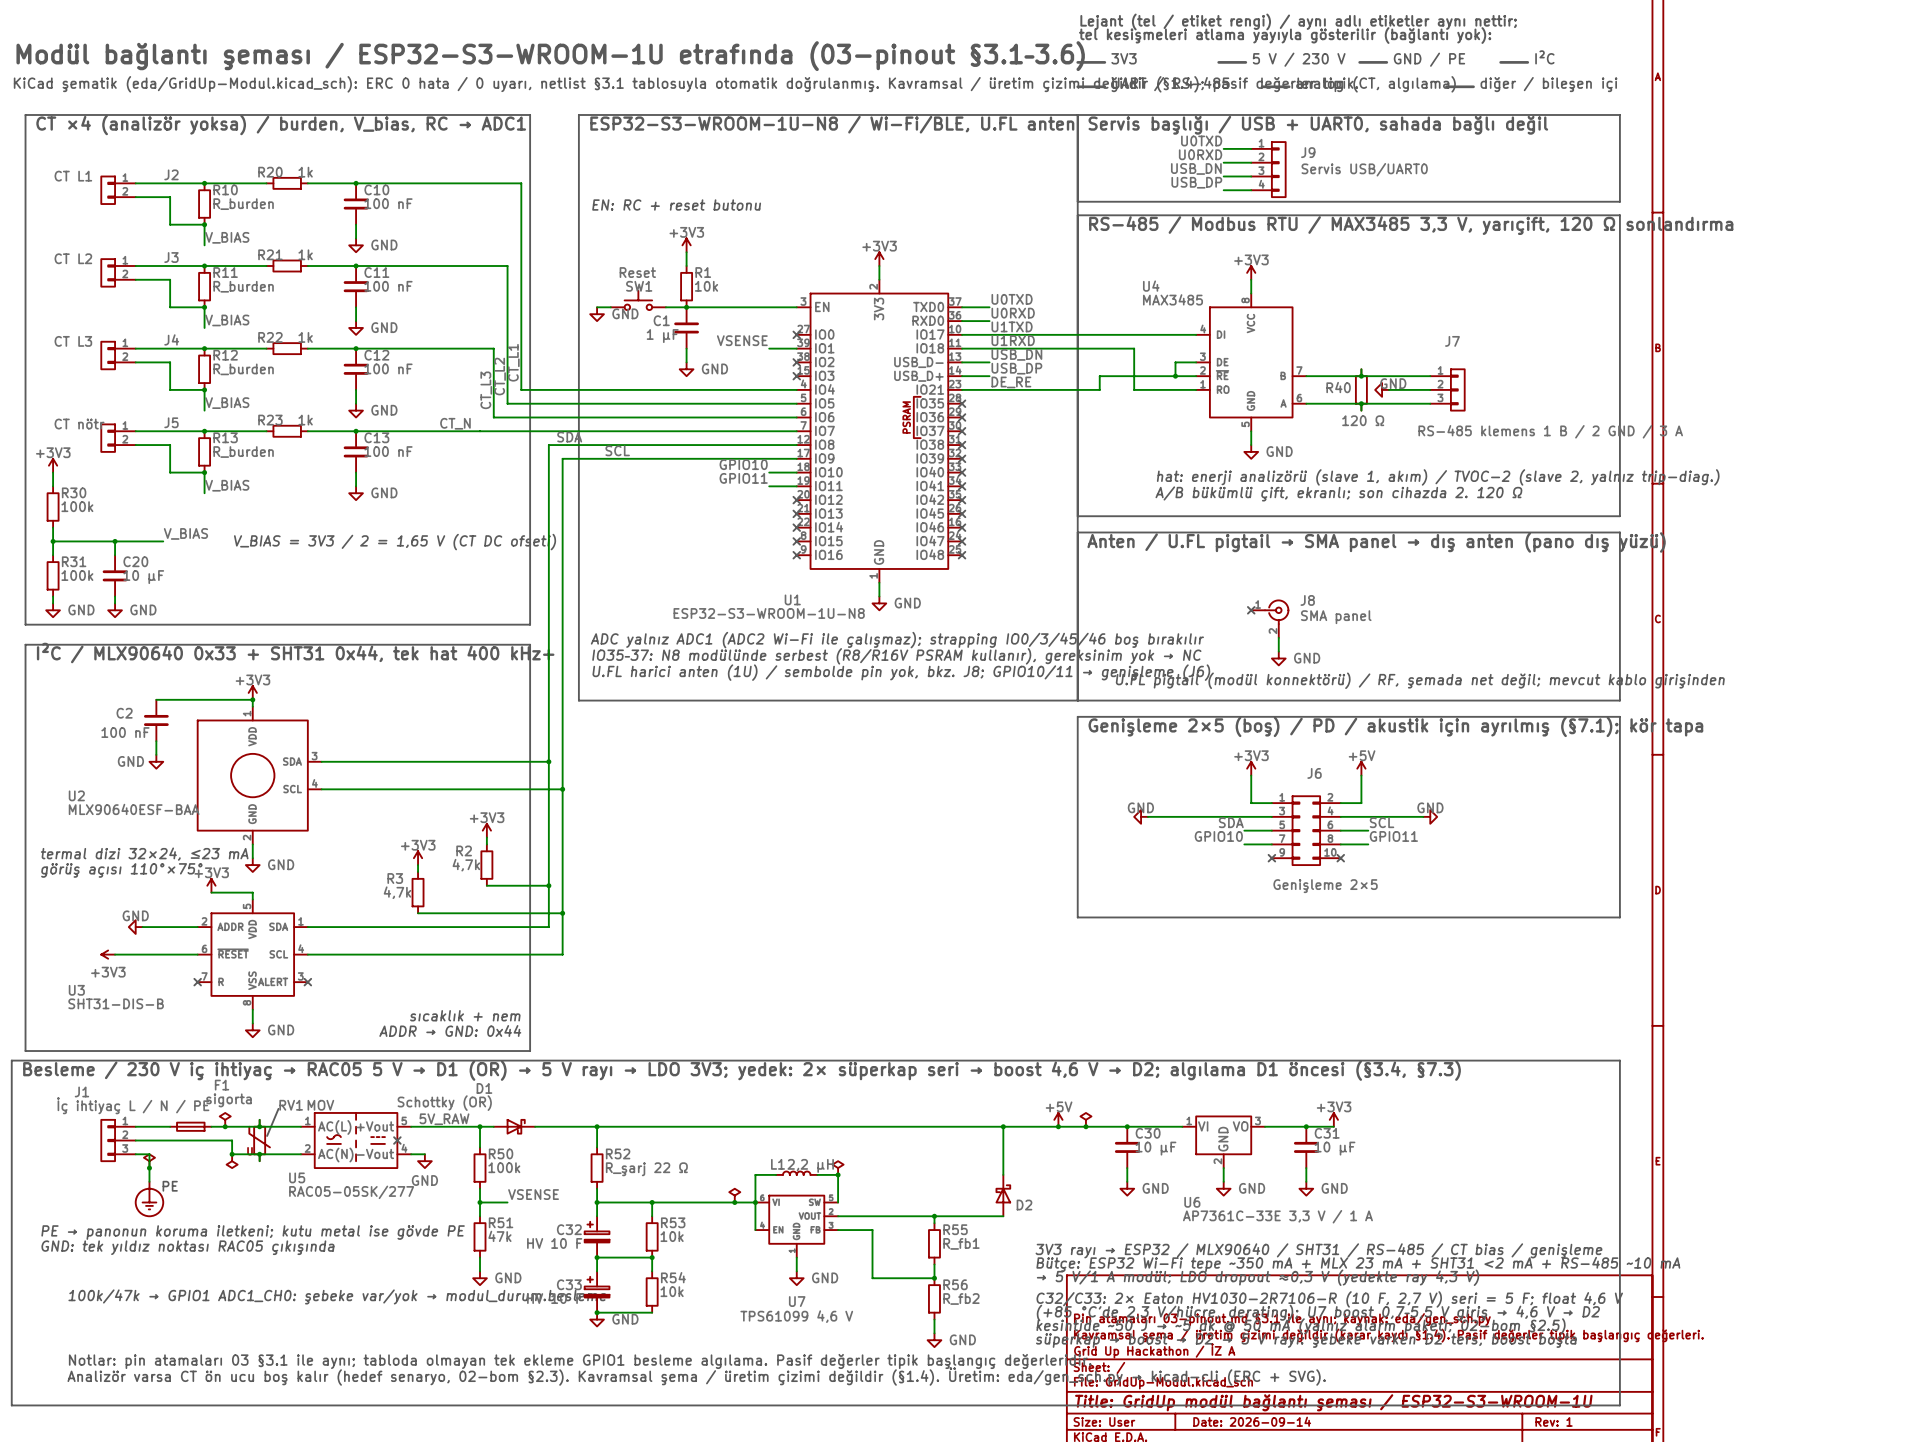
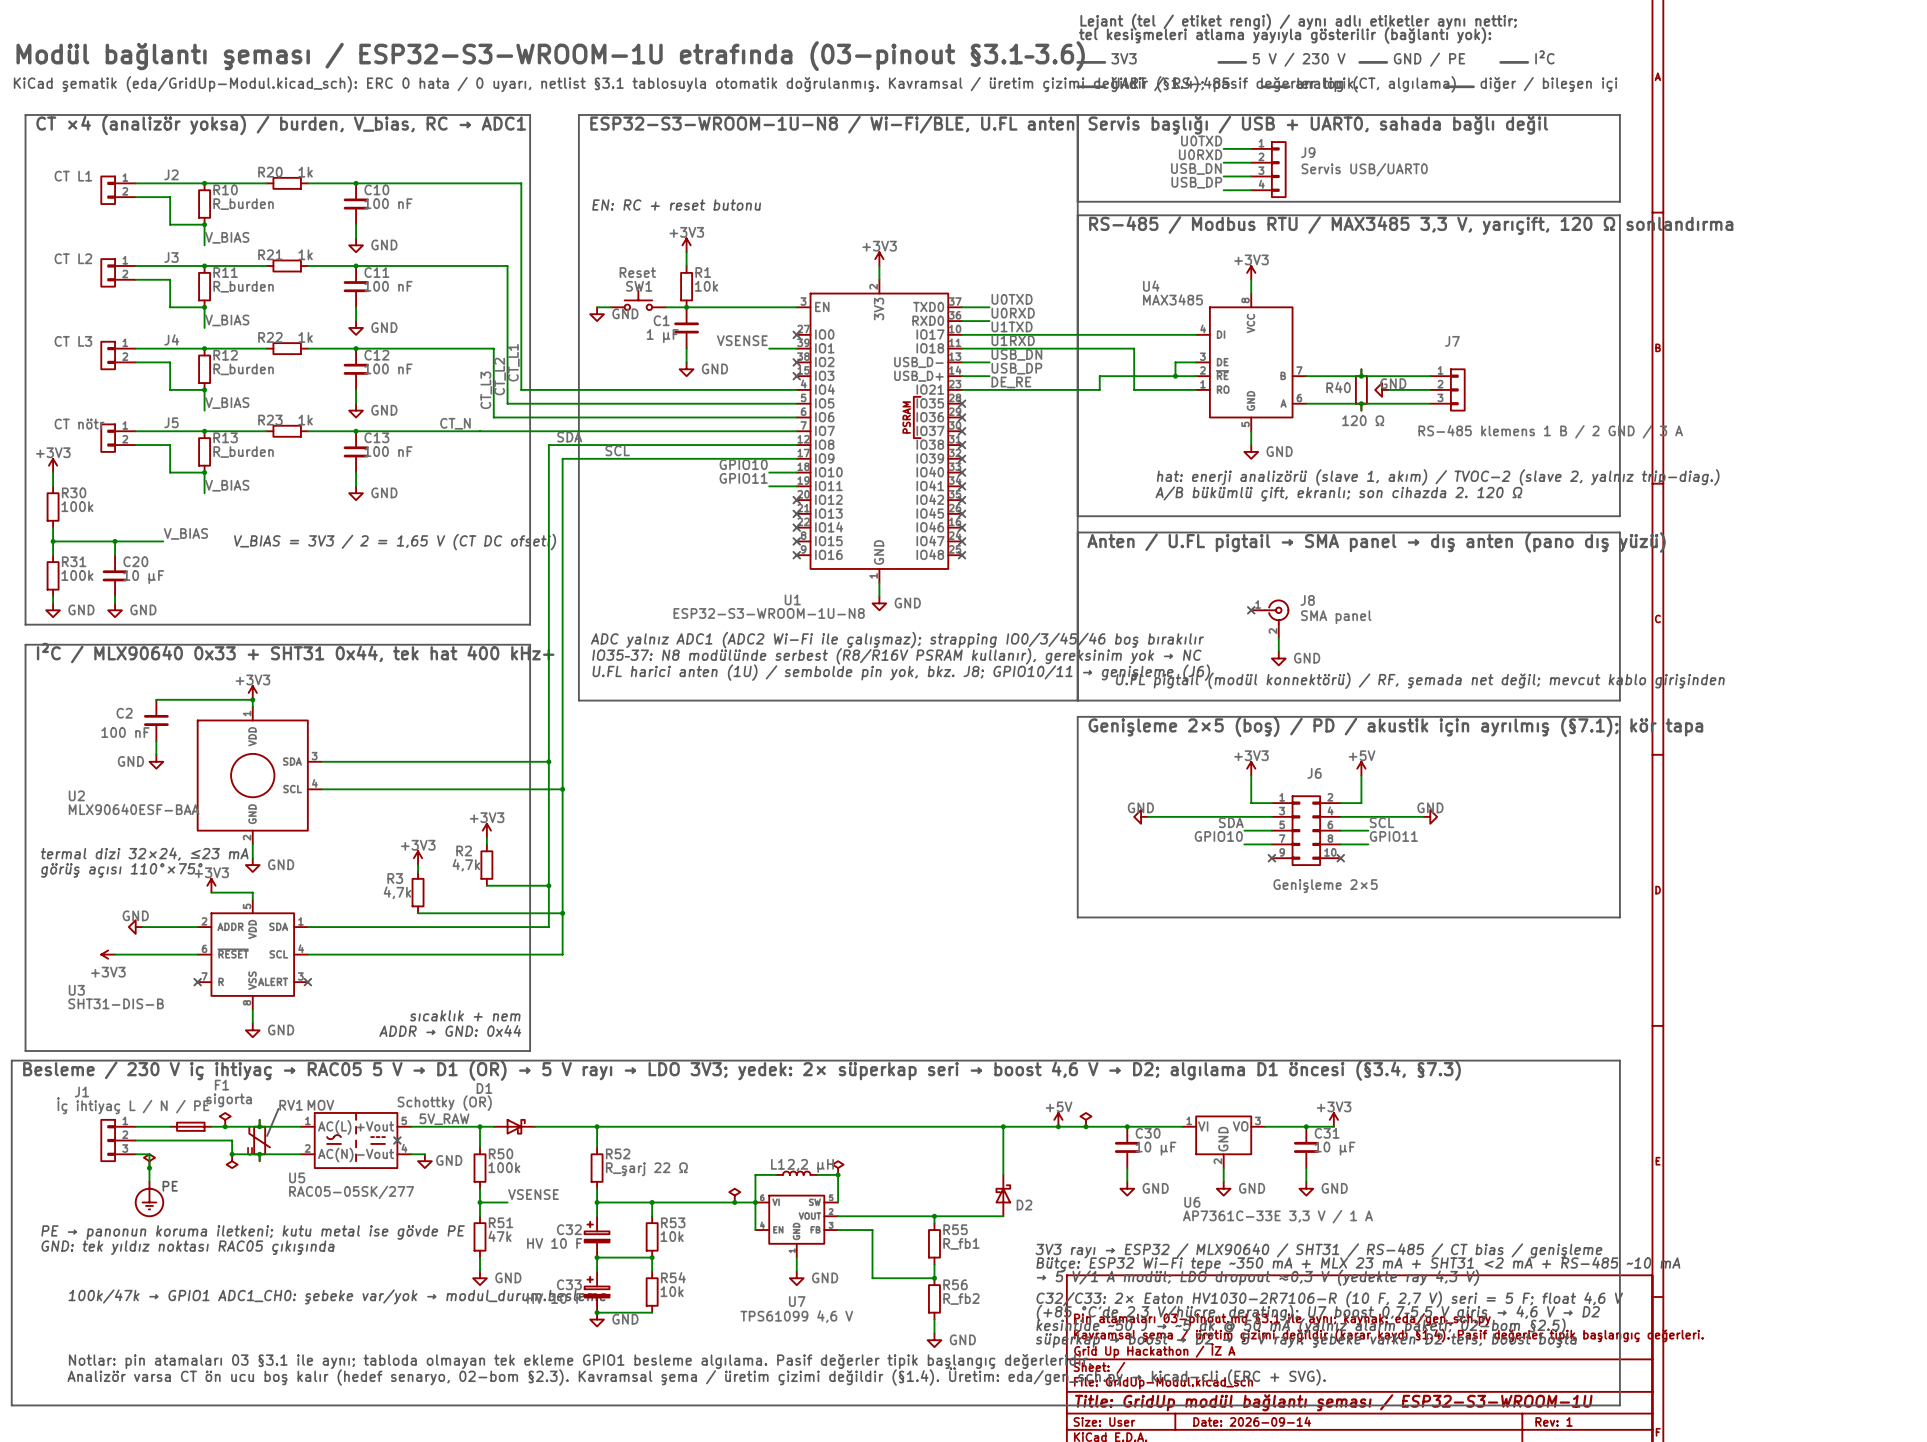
power symbol text position: GND (424, 1180) -> GND (449, 1160)

